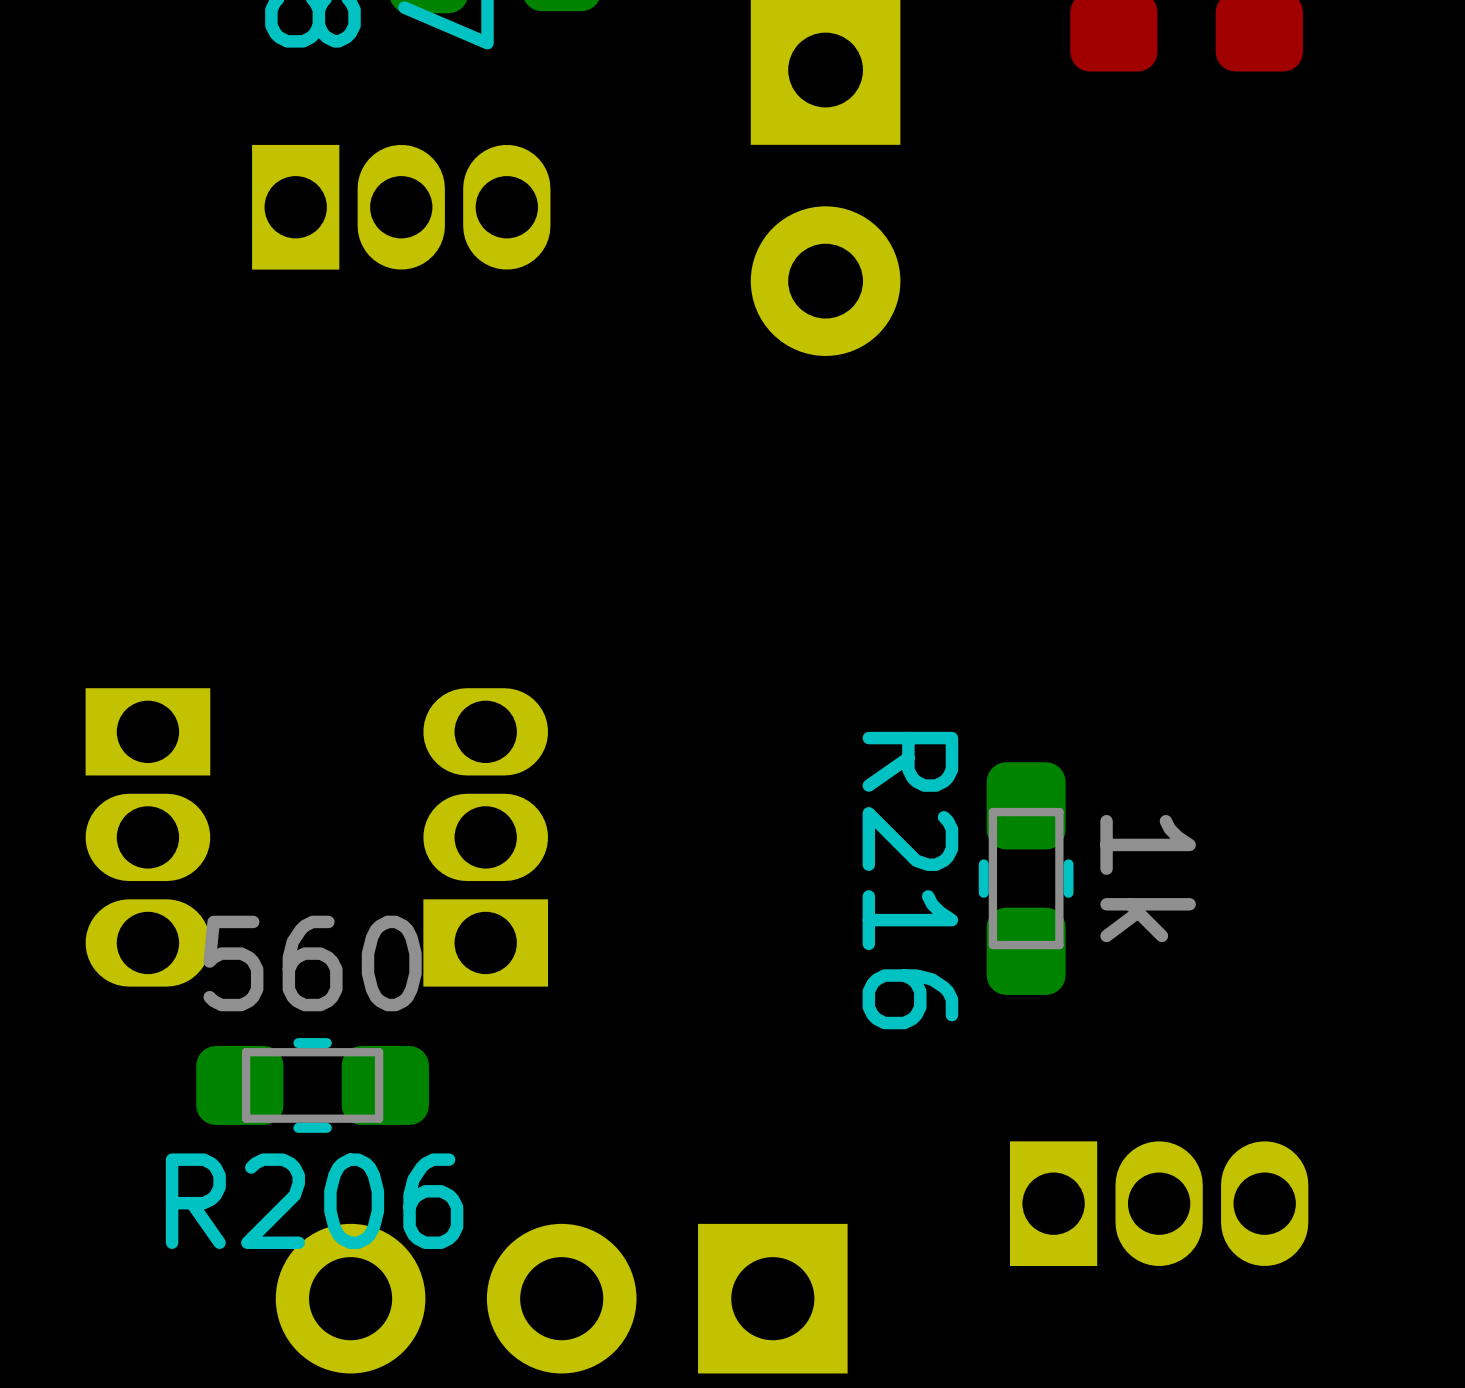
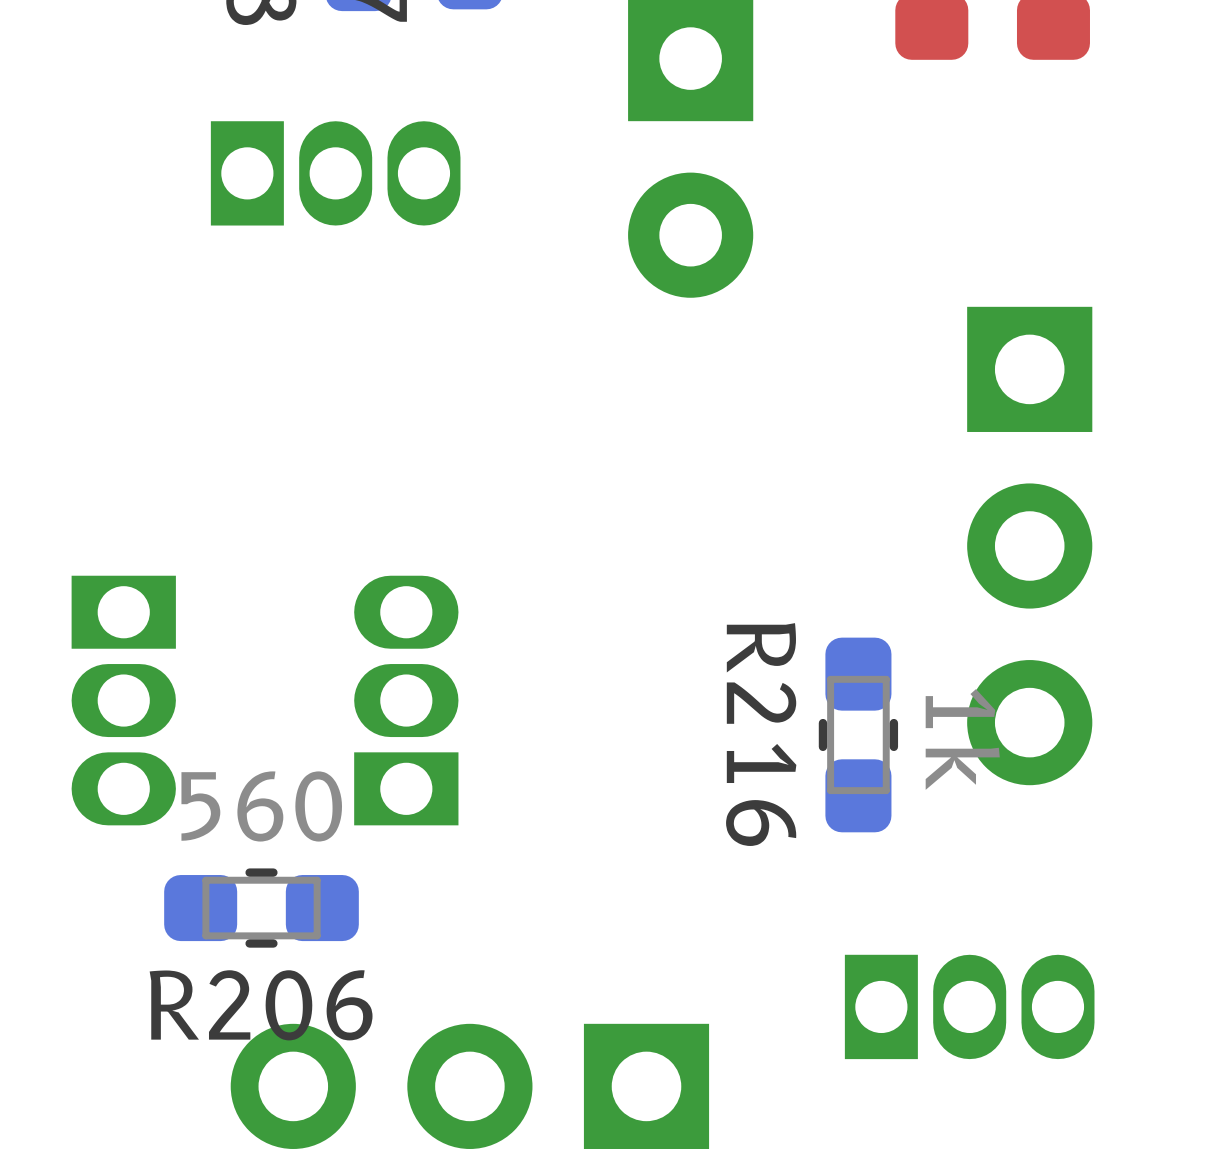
part: none -> (1029, 546)

